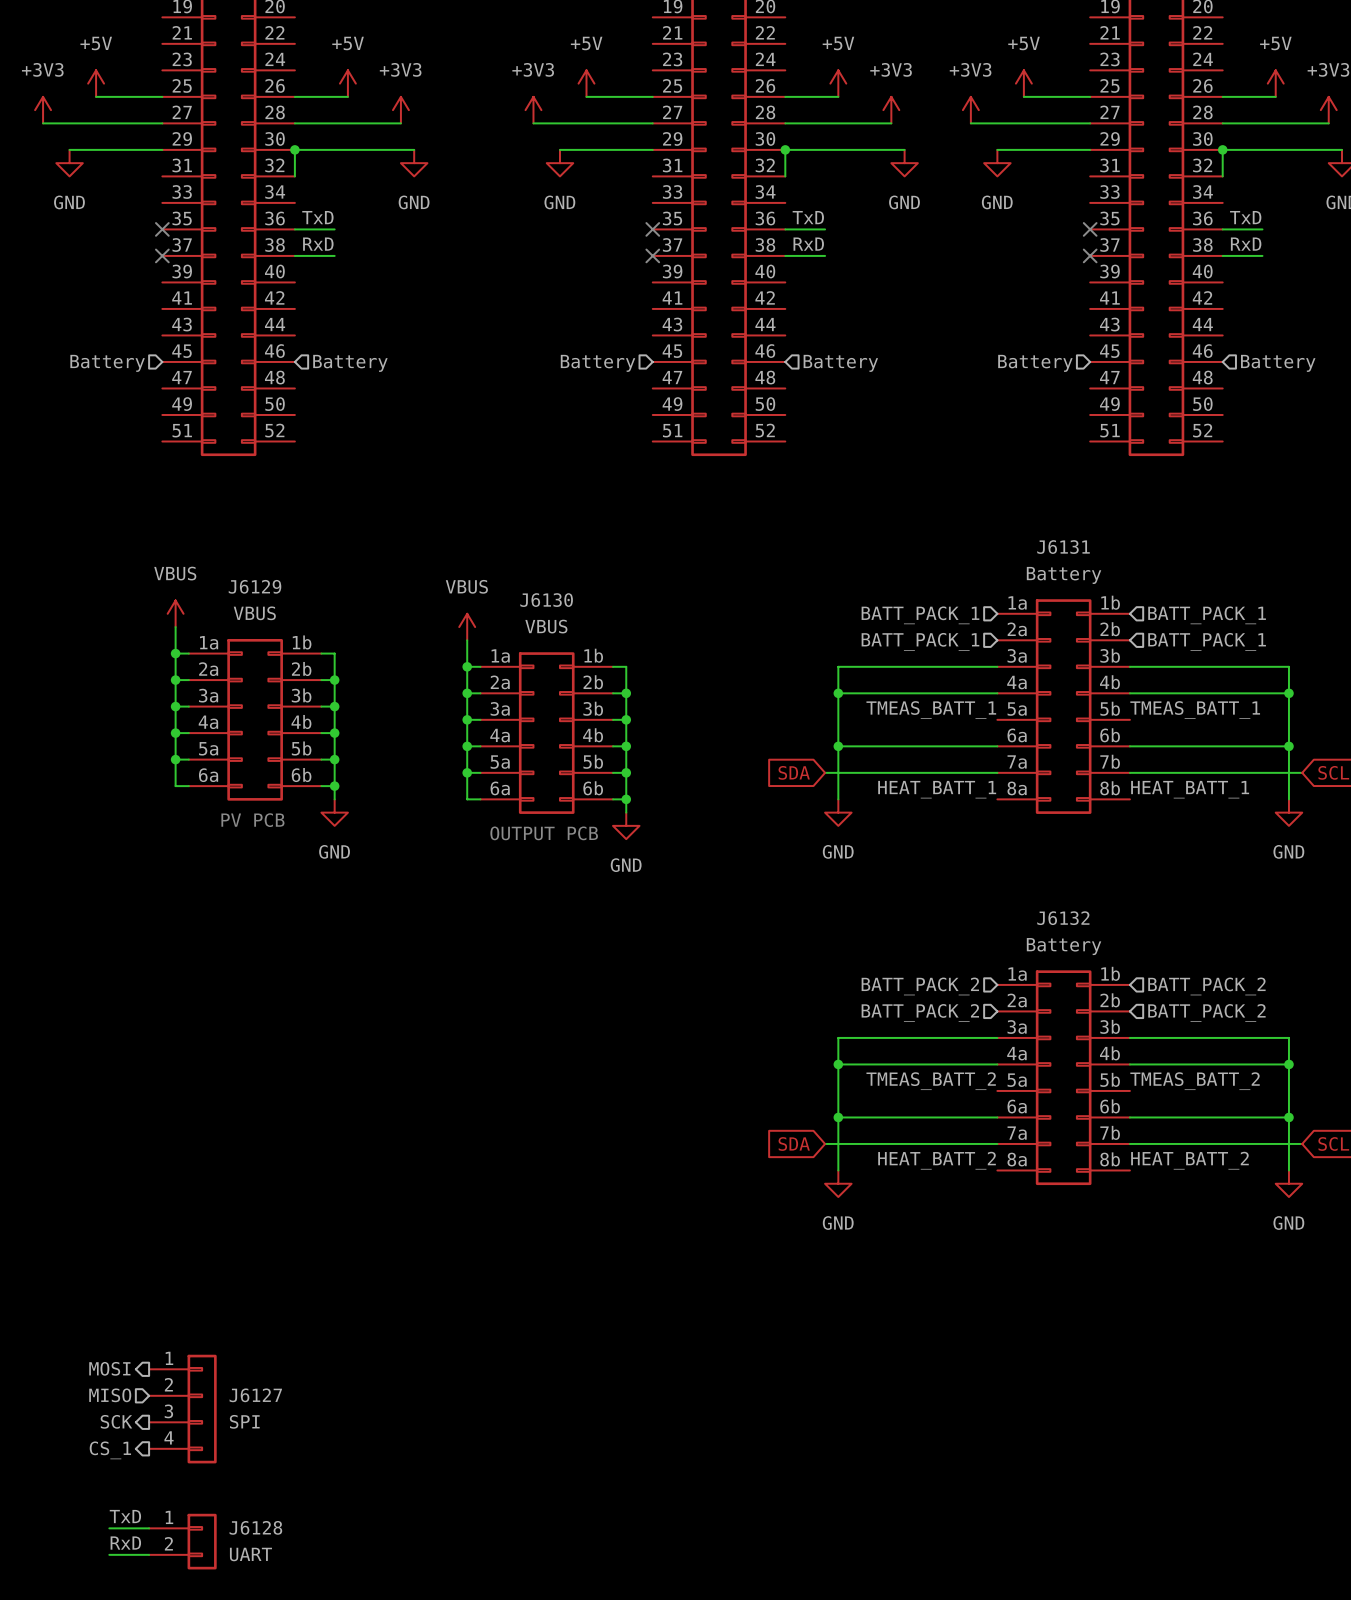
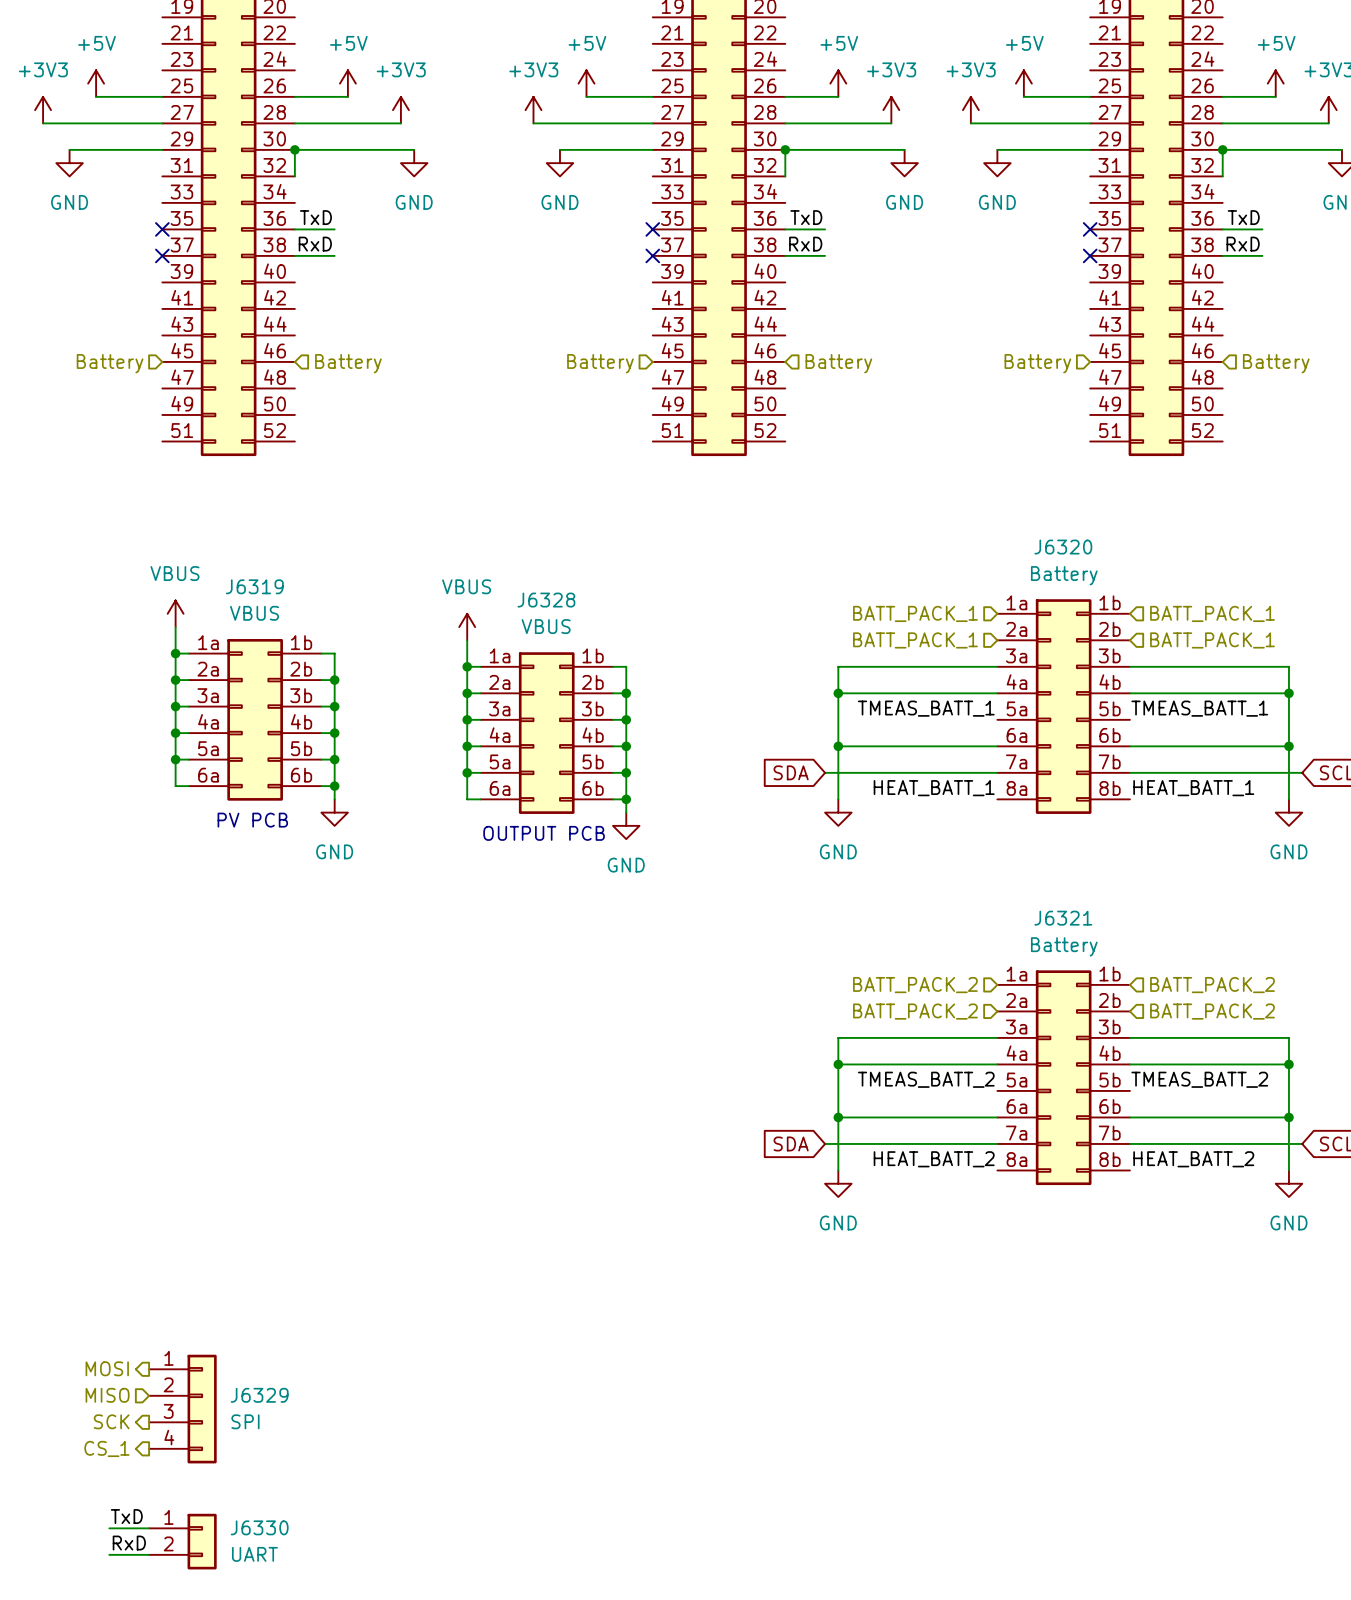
J6131 name: J6131 (1063, 547) -> J6320 (1063, 547)
J6129 name: J6129 (255, 586) -> J6319 (254, 586)
J6130 name: J6130 (546, 600) -> J6328 (546, 600)
J6132 name: J6132 (1063, 918) -> J6321 (1063, 918)
J6127 name: J6127 (255, 1395) -> J6329 (259, 1395)
J6128 name: J6128 (255, 1527) -> J6330 (259, 1527)

